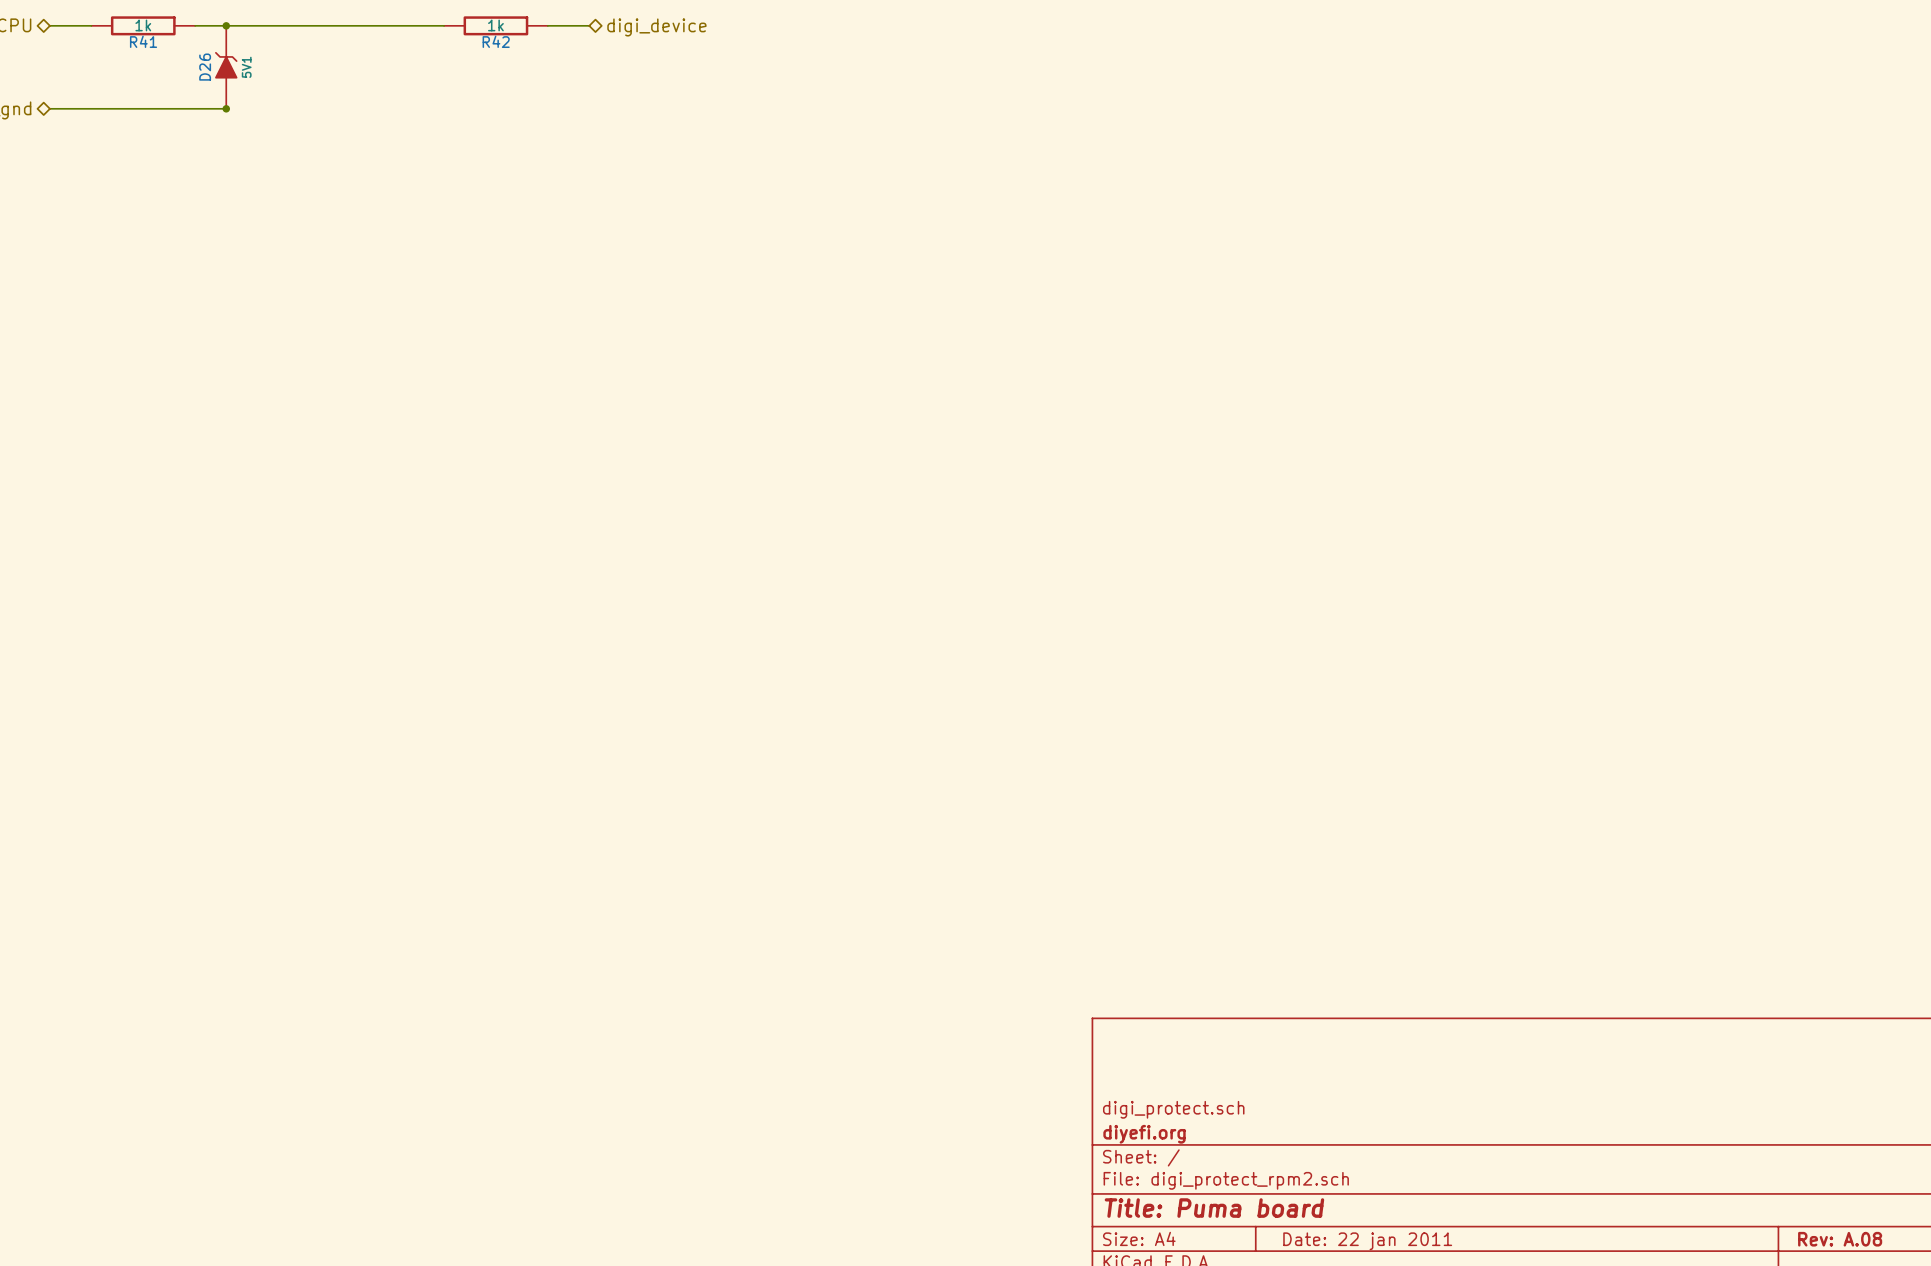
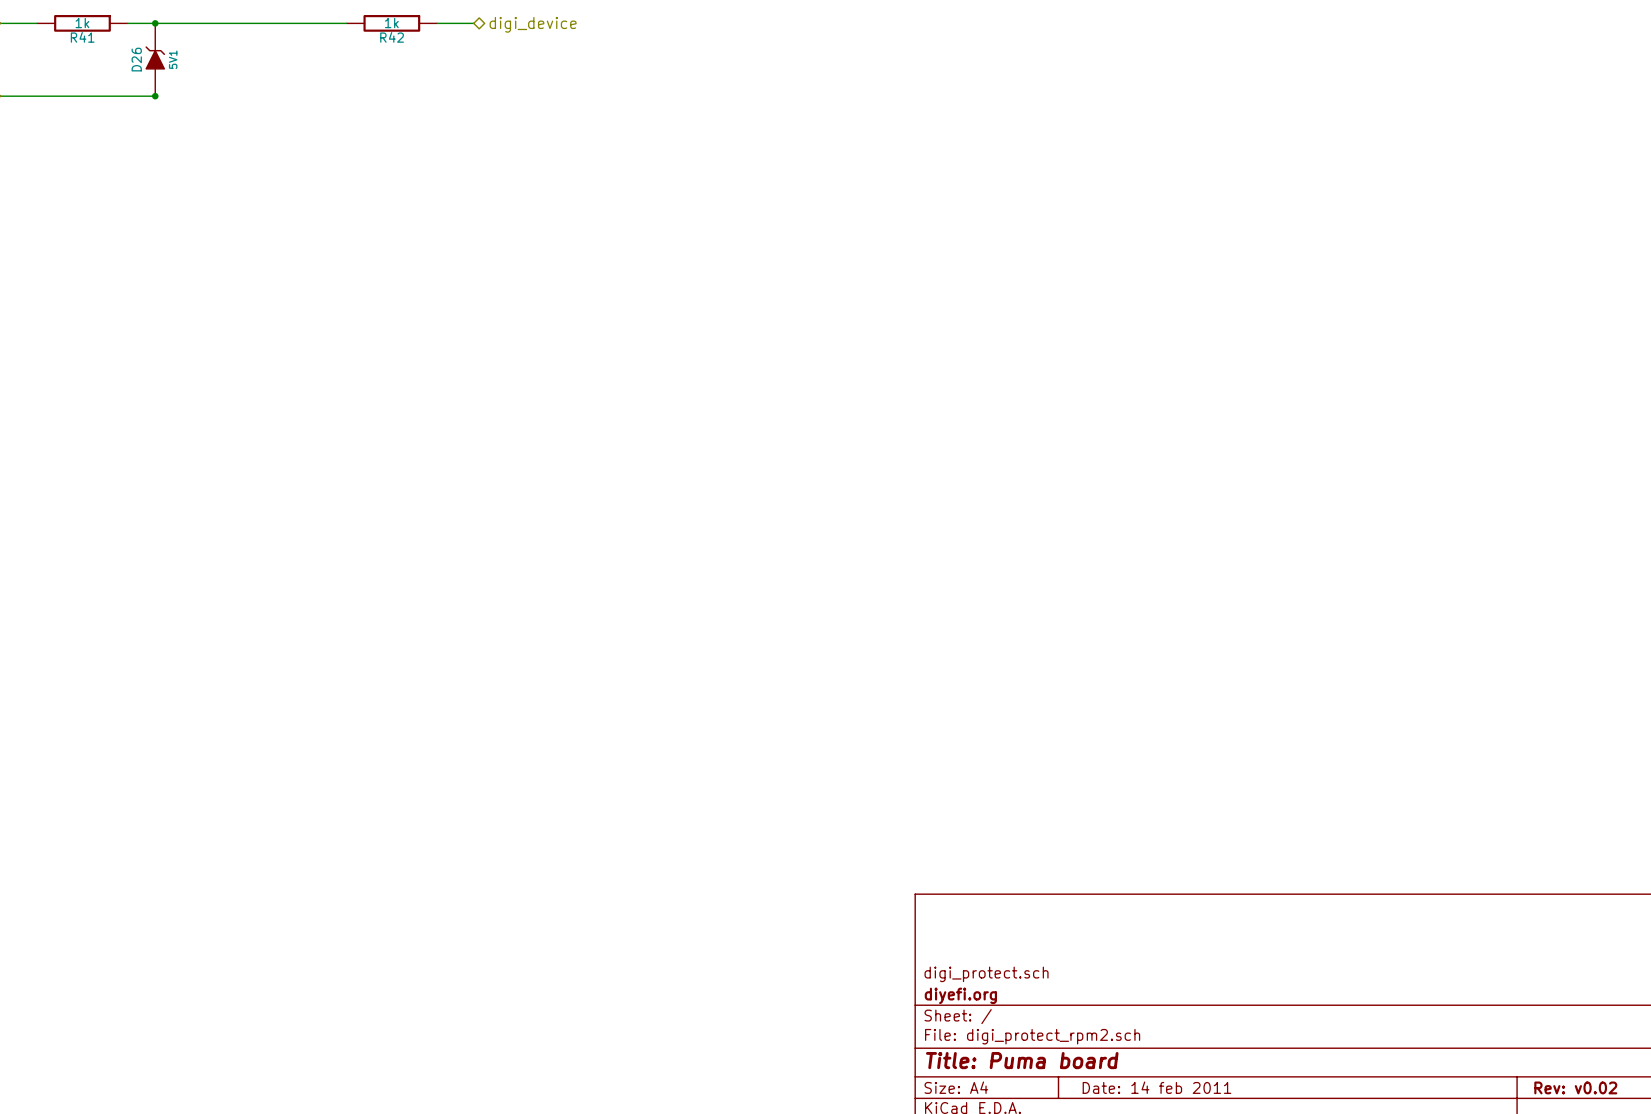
title block: Rev: A.08 (1840, 1239) -> Rev: v0.02 (1575, 1087)
title block: Date: 22 jan 2011 (1367, 1241) -> Date: 14 feb 2011 (1156, 1087)

